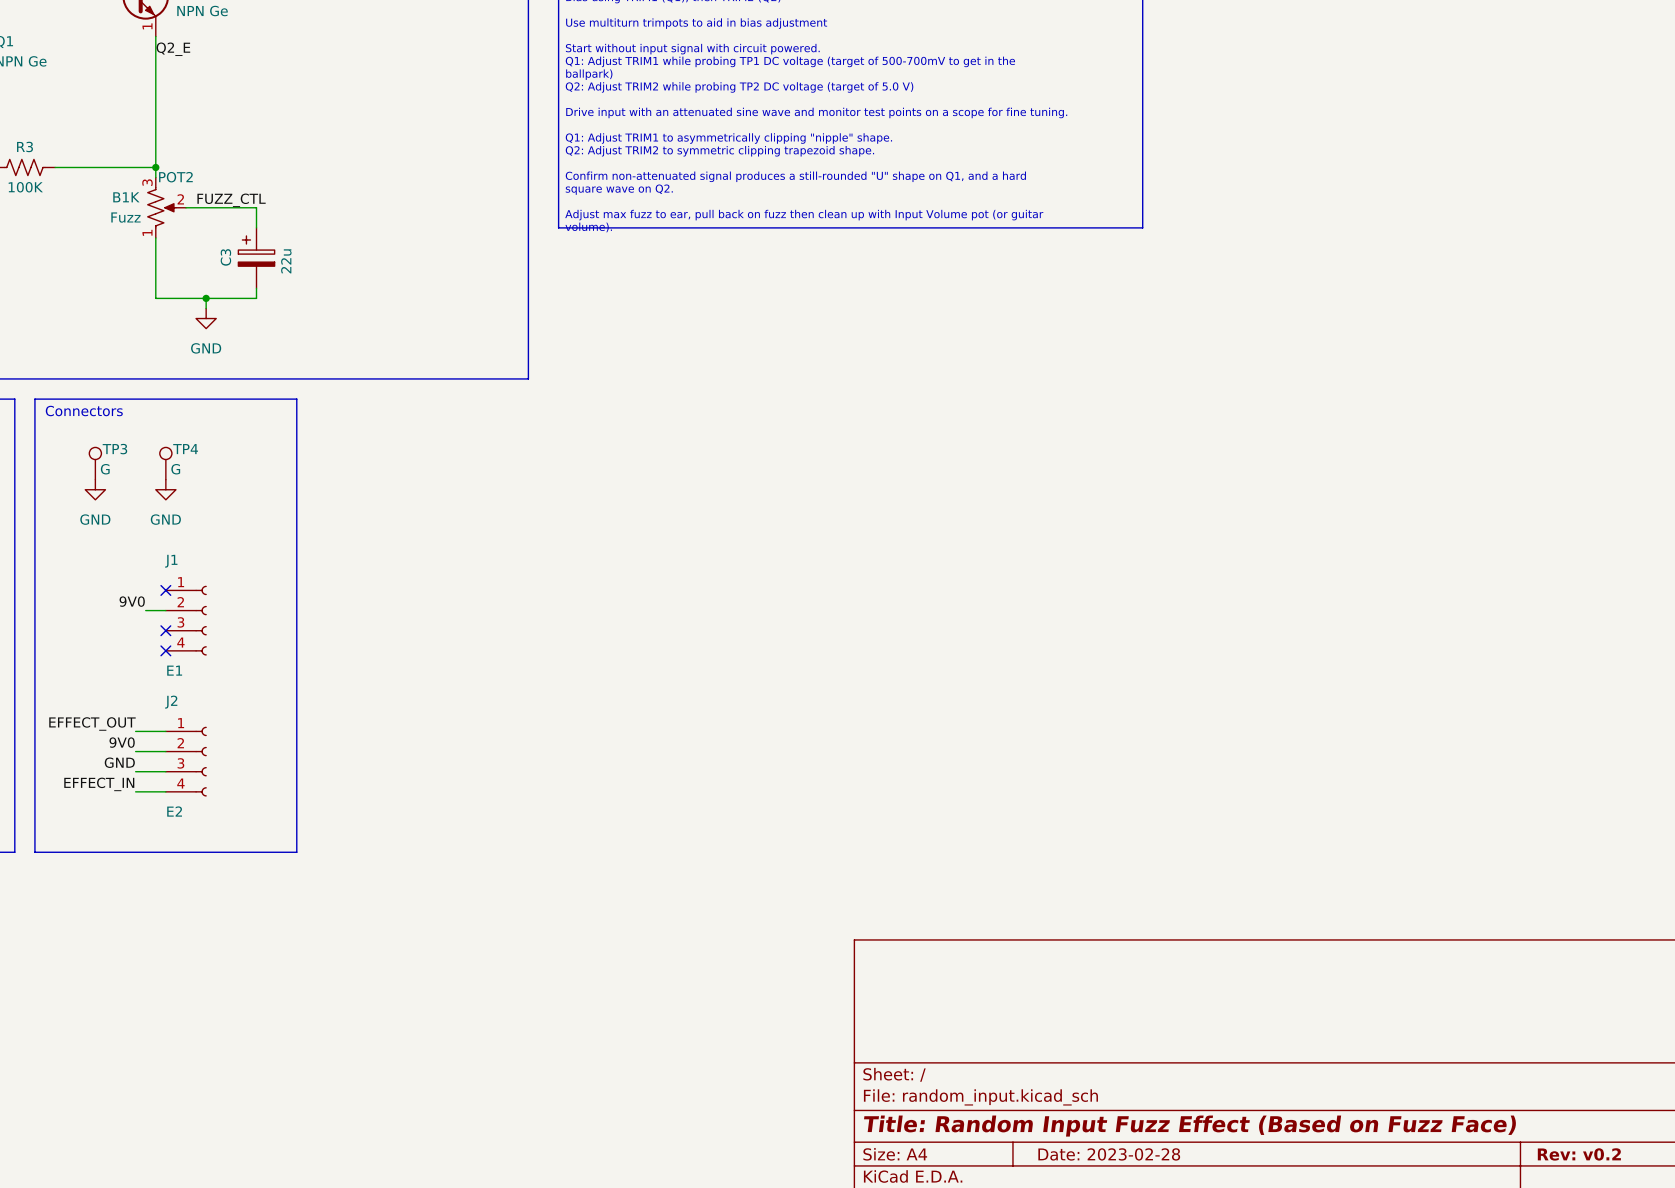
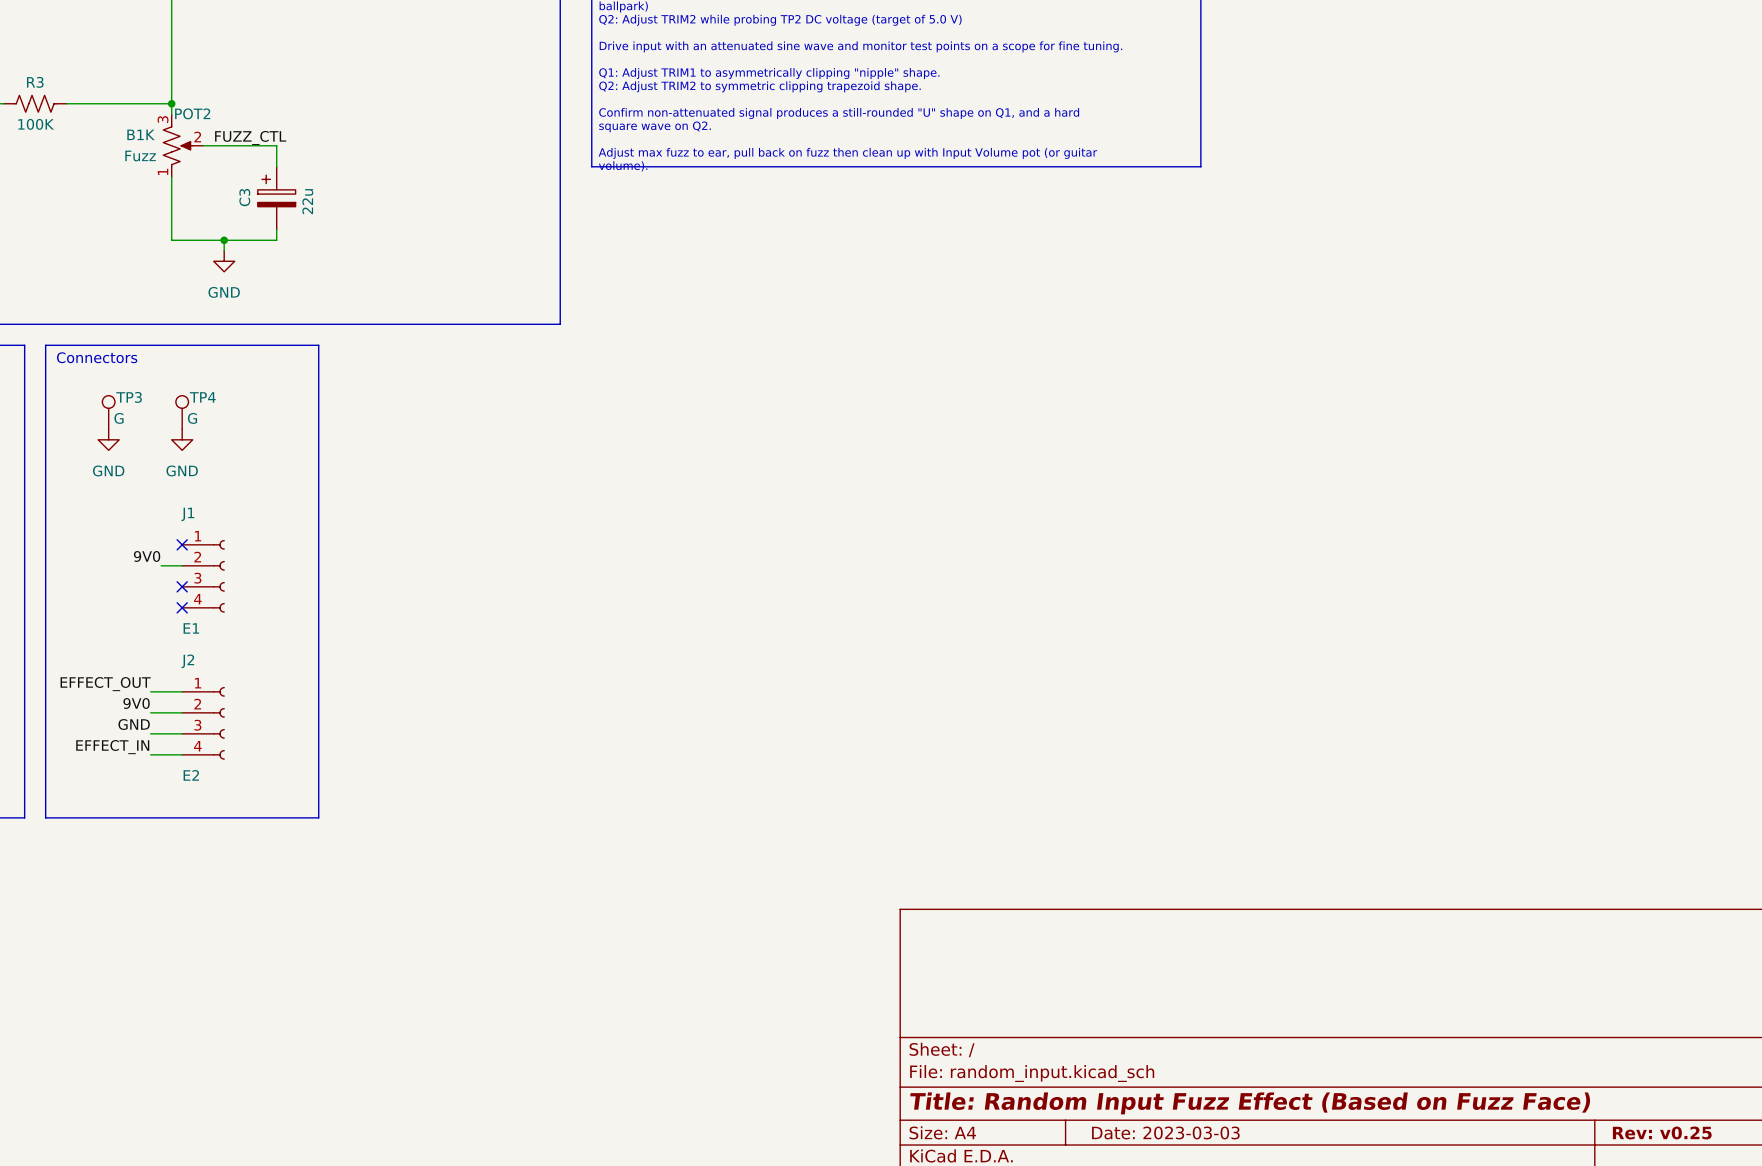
title block: Date: 2023-02-28 (1109, 1154) -> Date: 2023-03-03 (1165, 1132)
title block: Rev: v0.2 (1579, 1154) -> Rev: v0.25 (1662, 1132)

